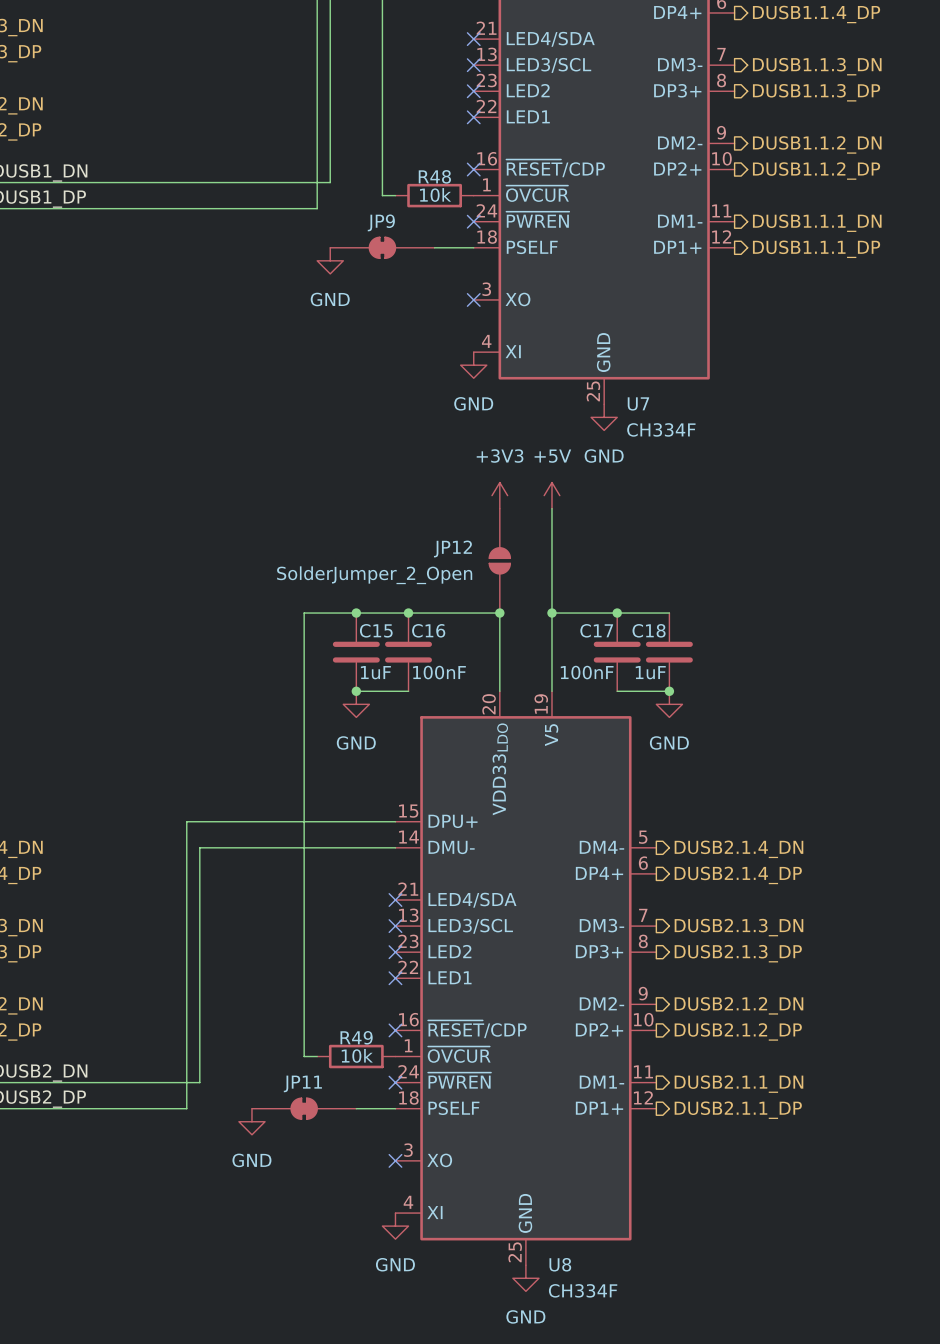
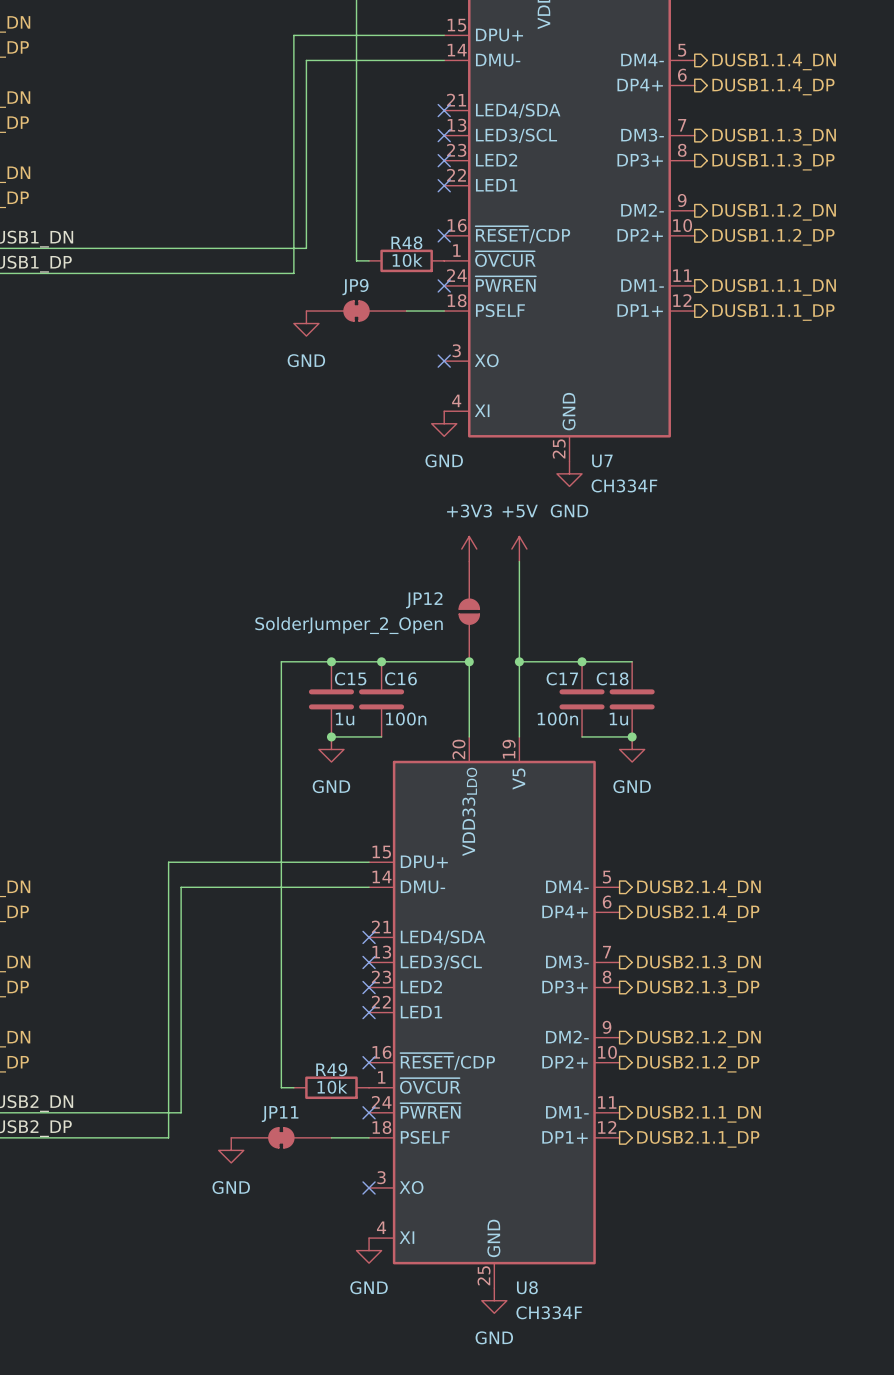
C15 value: 1uF (375, 672) -> 1u (345, 719)
C16 value: 100nF (439, 672) -> 100n (406, 718)
C17 value: 100nF (587, 672) -> 100n (557, 718)
C18 value: 1uF (650, 672) -> 1u (618, 719)

